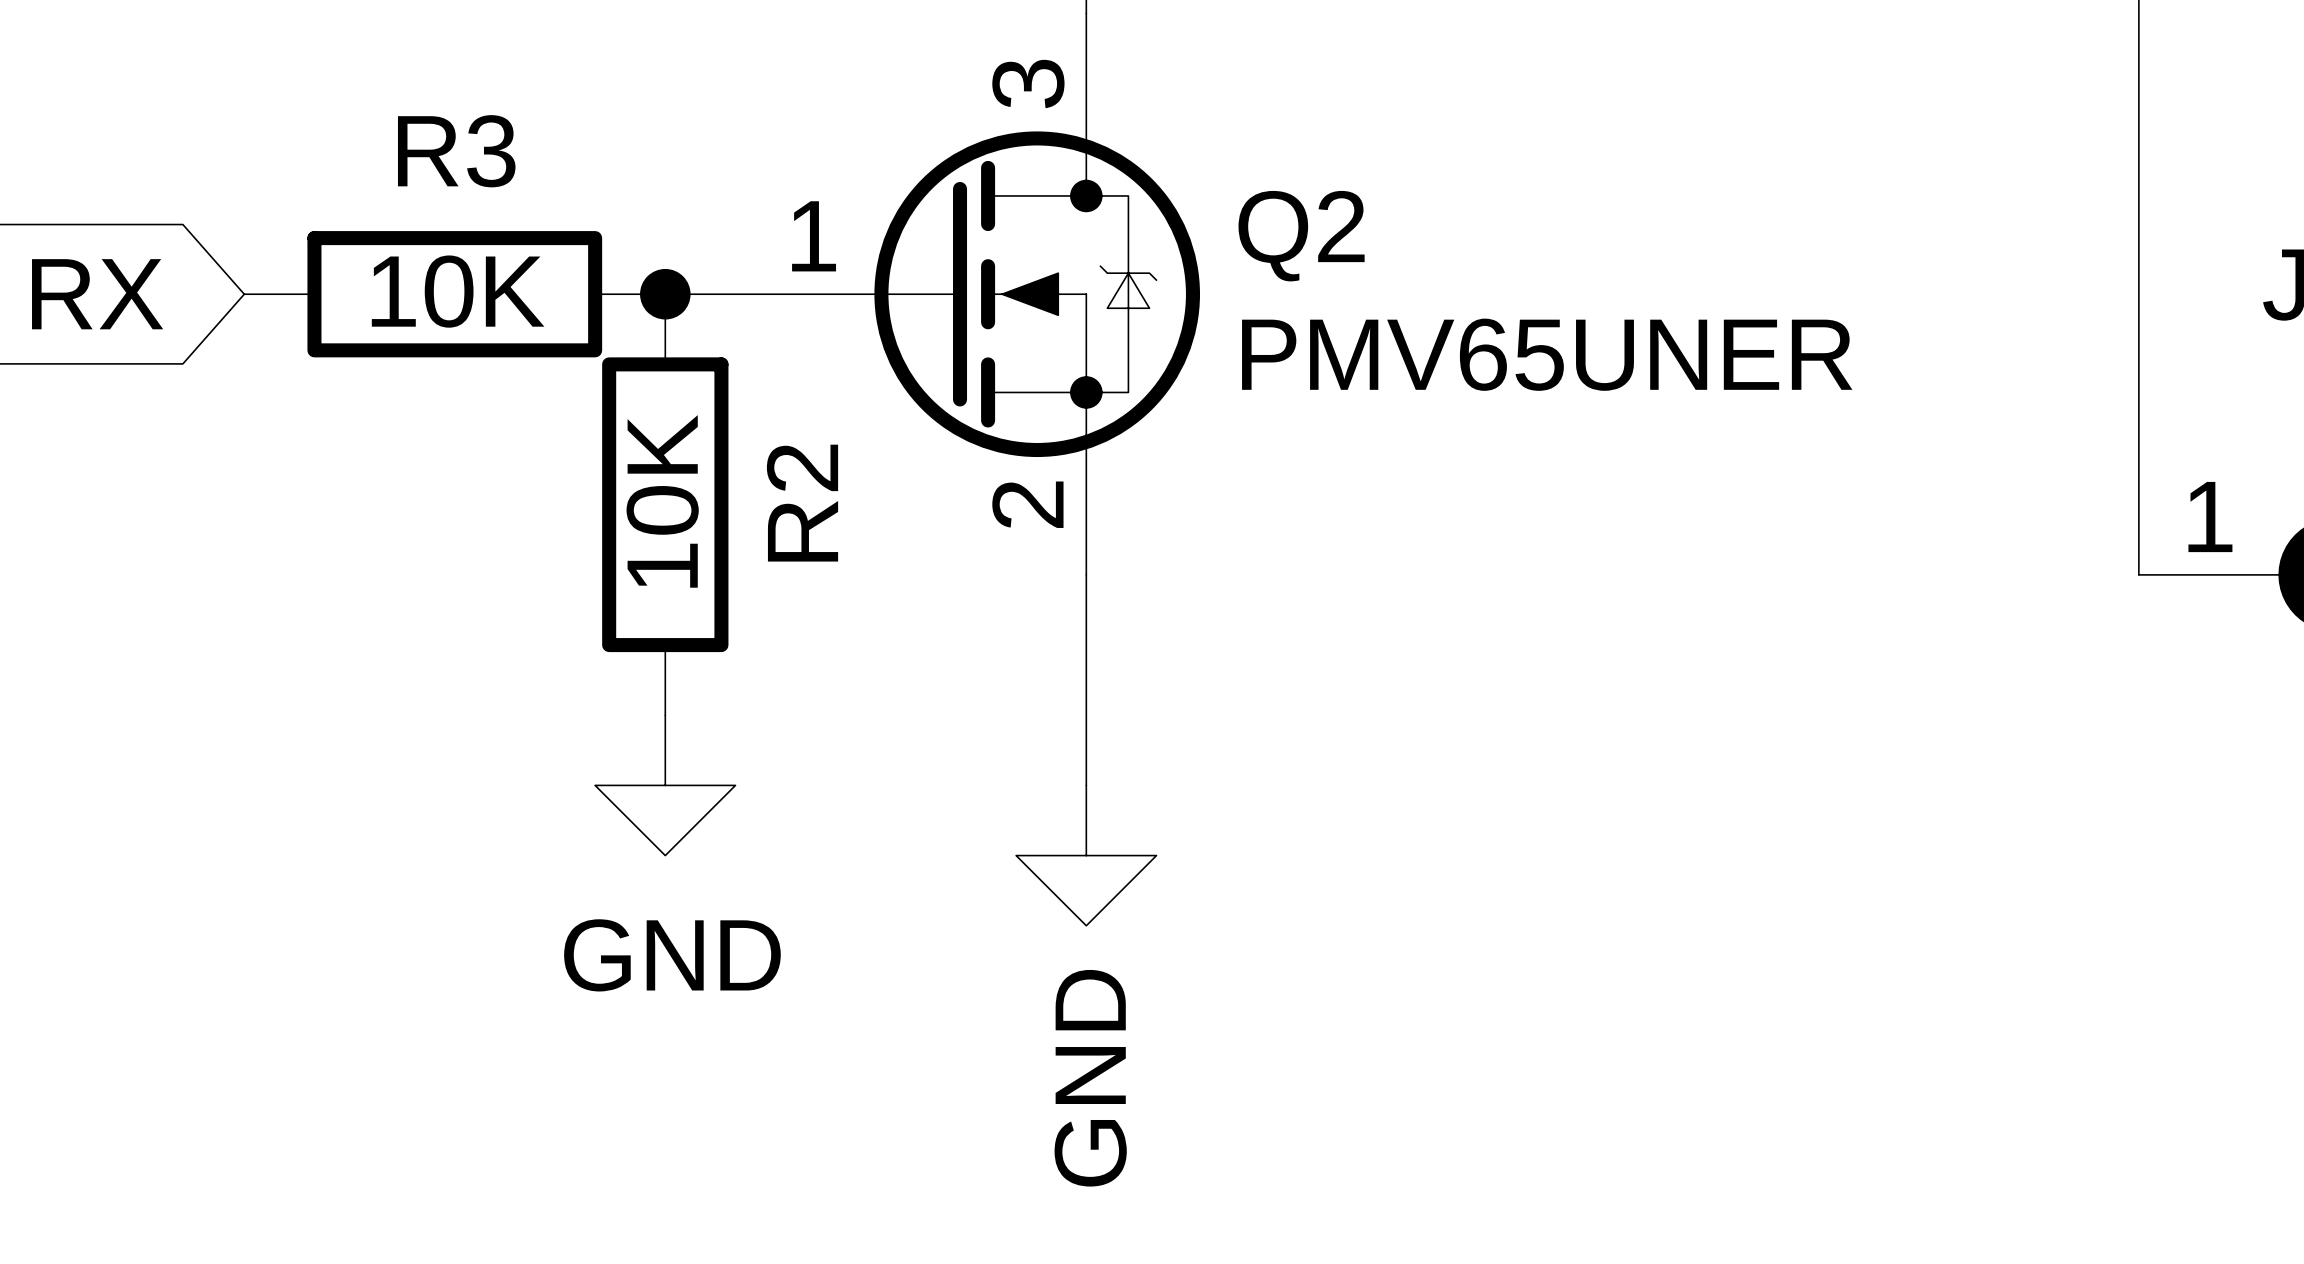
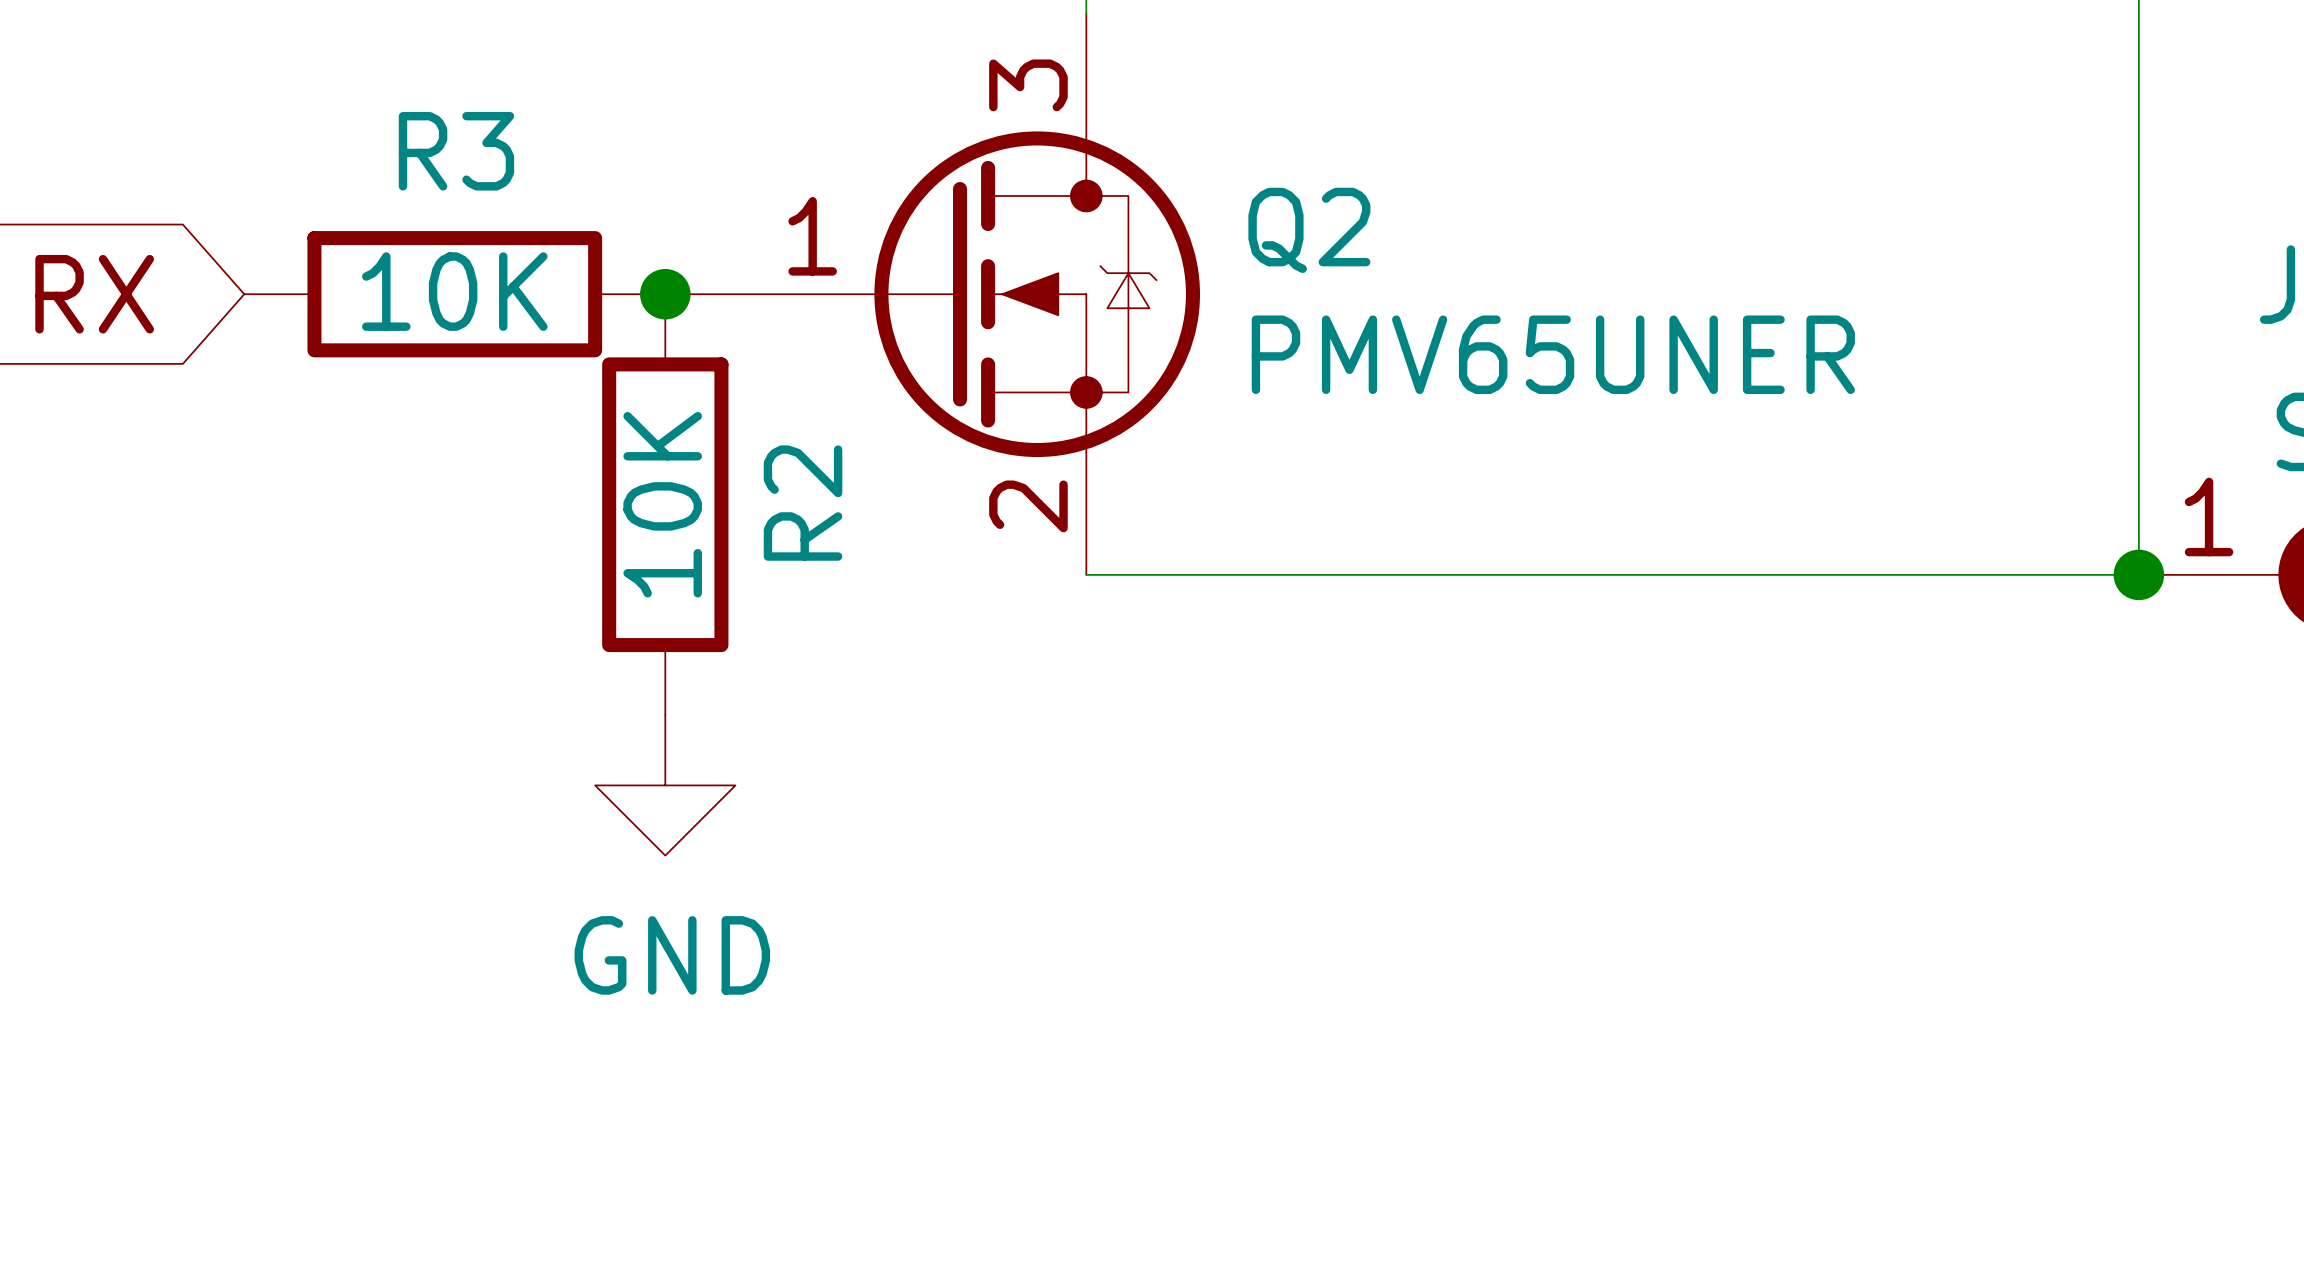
wire: (1086, 574) (1086, 785) -> (1086, 574) (2138, 574)
junction: none -> (2138, 574)
power symbol: GND (1086, 855) -> none

